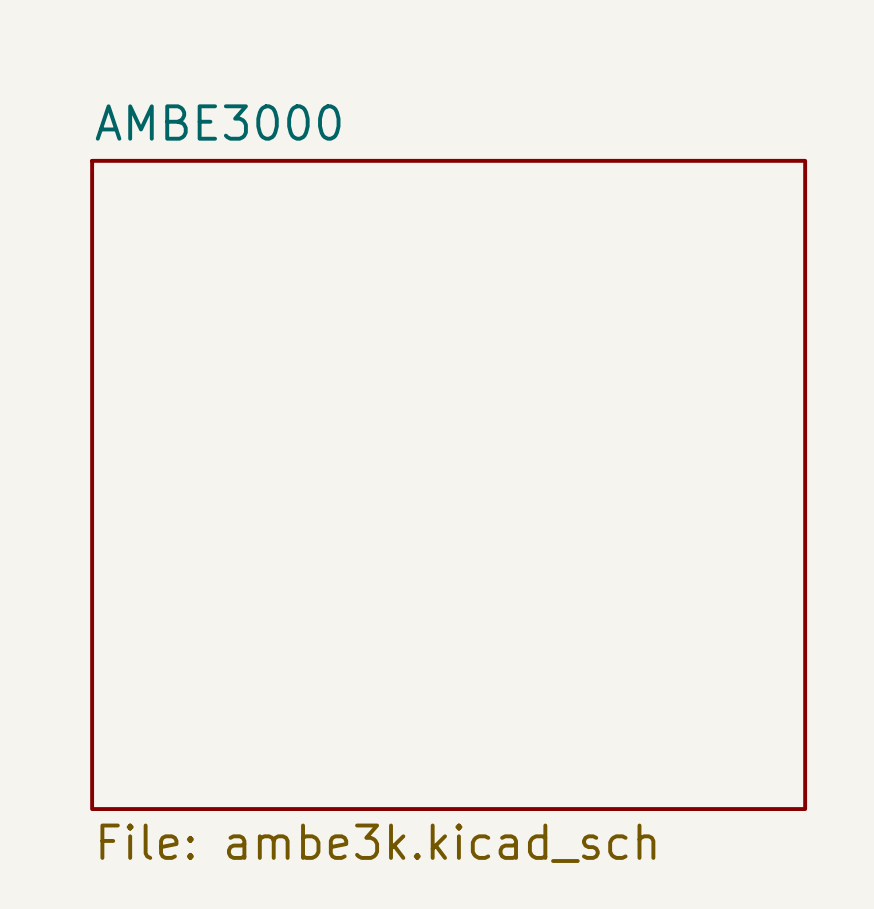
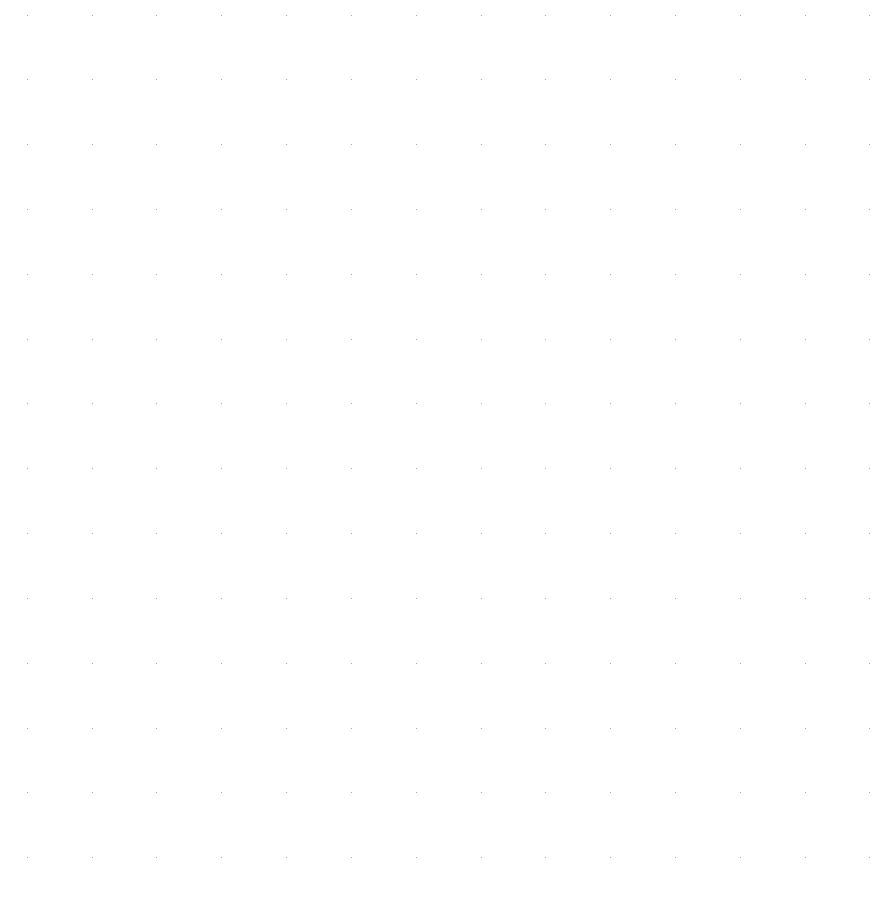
sheet AMBE3000: File: ambe3k.kicad_sch (448, 484) -> none

